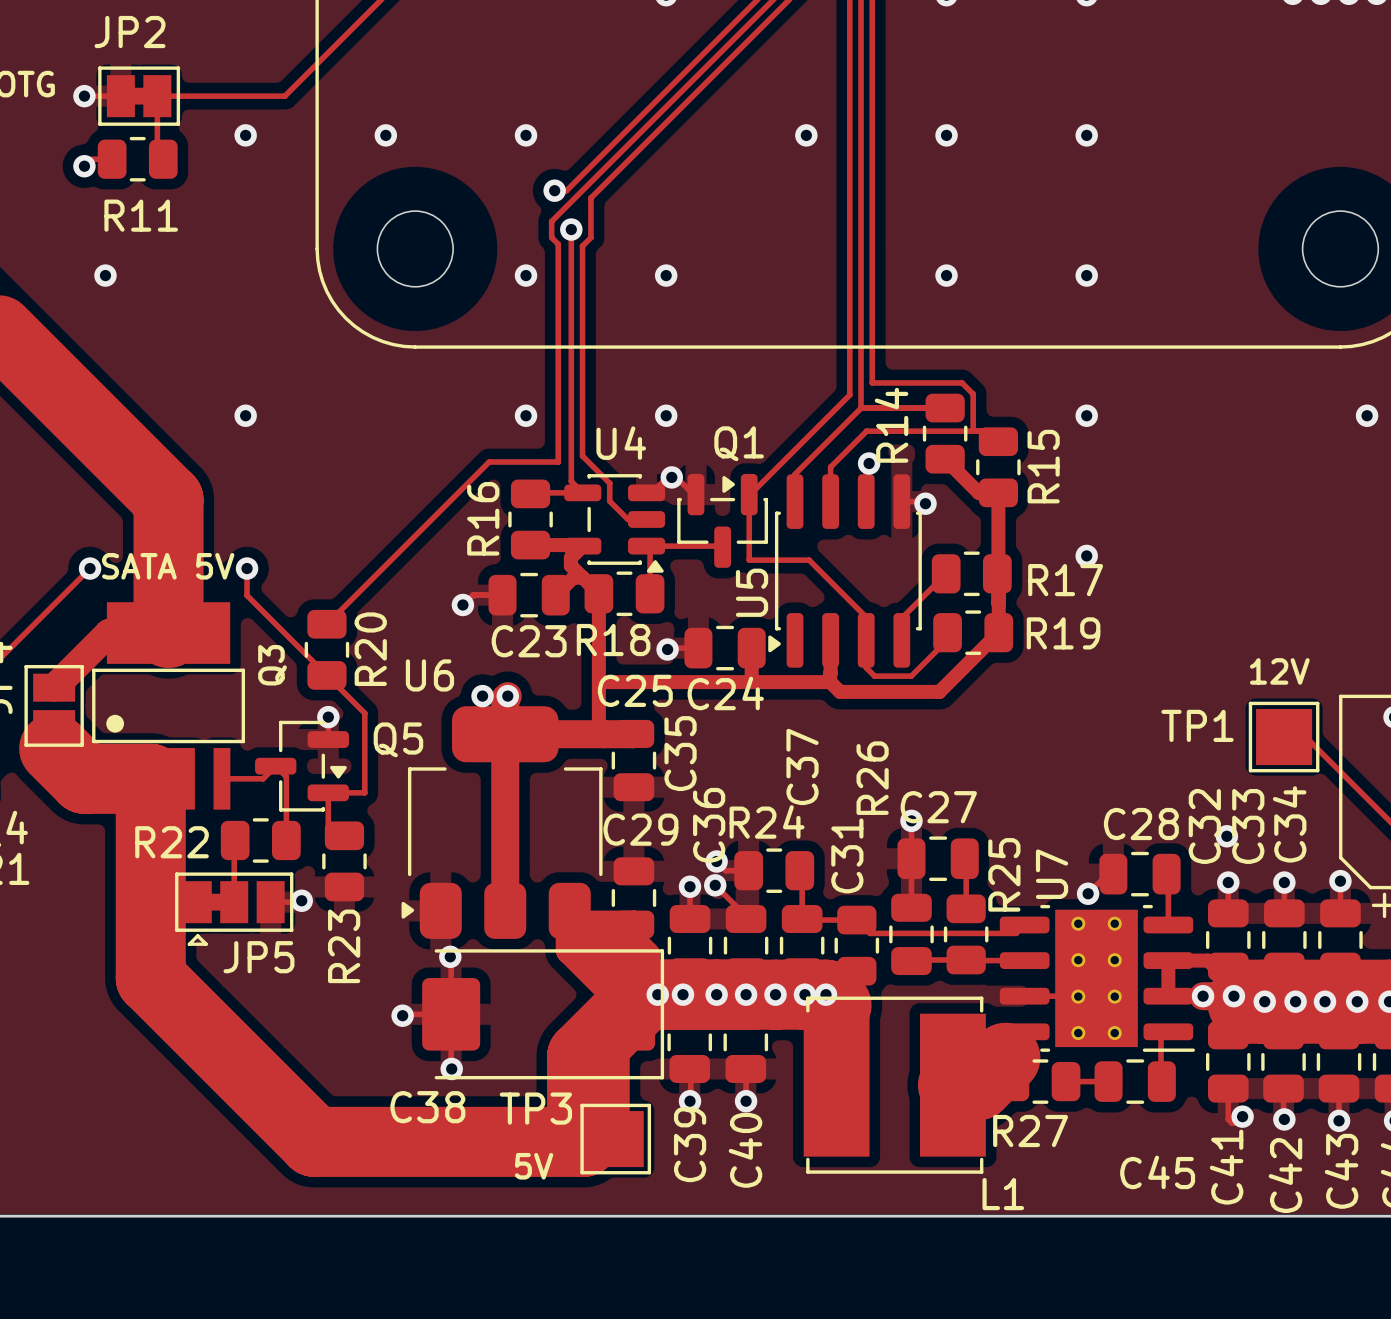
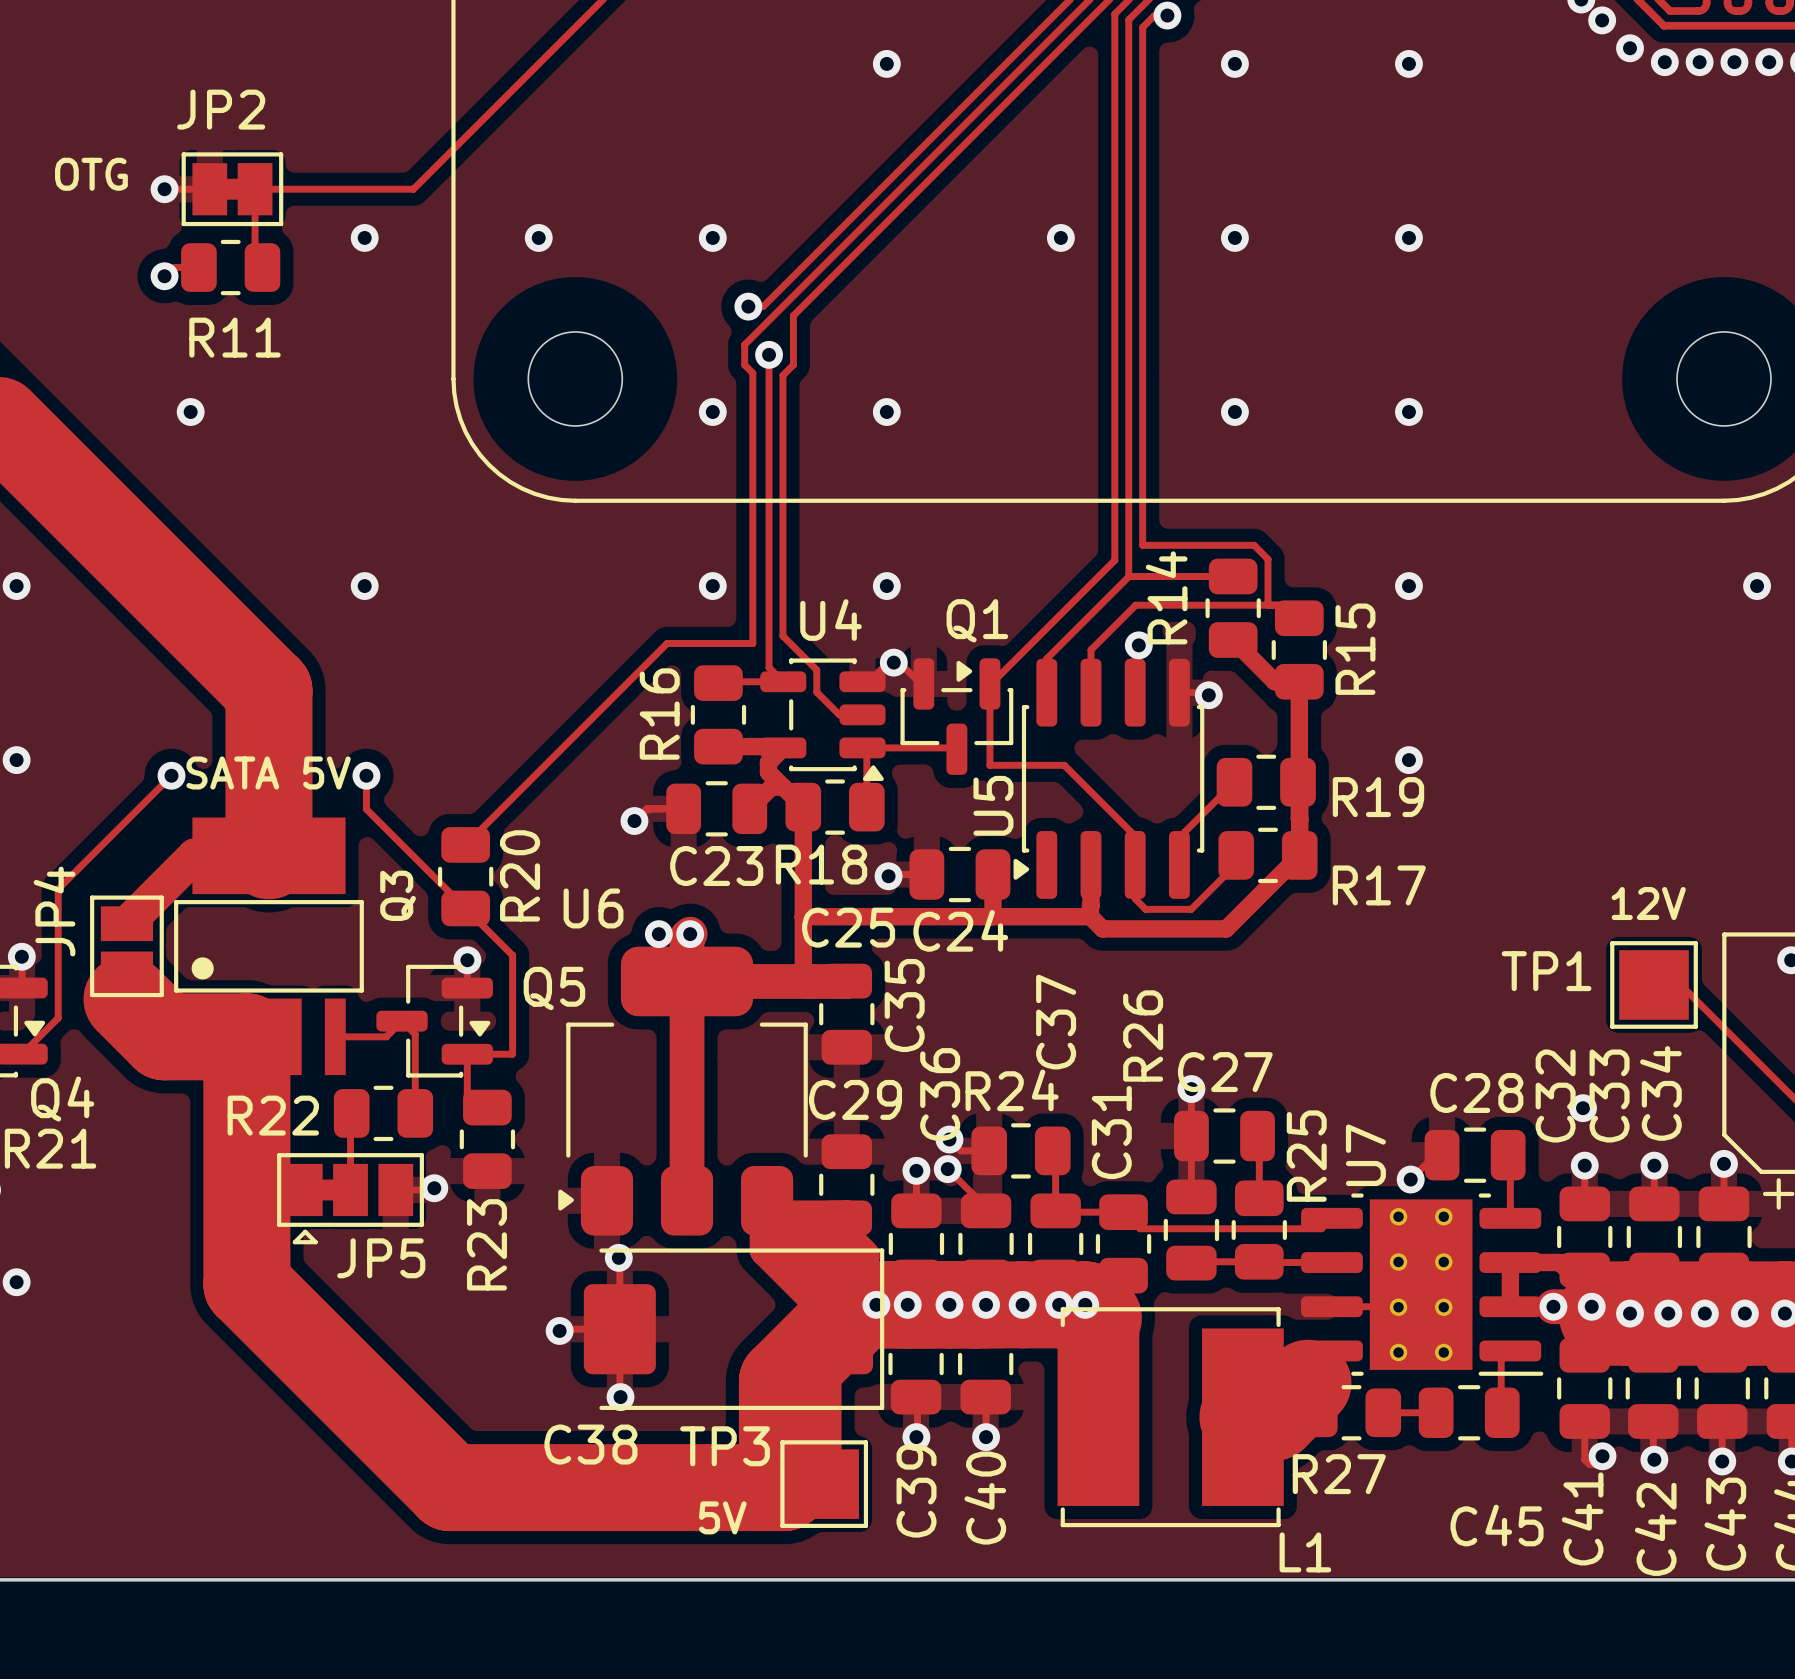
R17 name position: R17 (1065, 580) -> R17 (1379, 885)
R19 name position: R19 (1063, 633) -> R19 (1378, 797)

